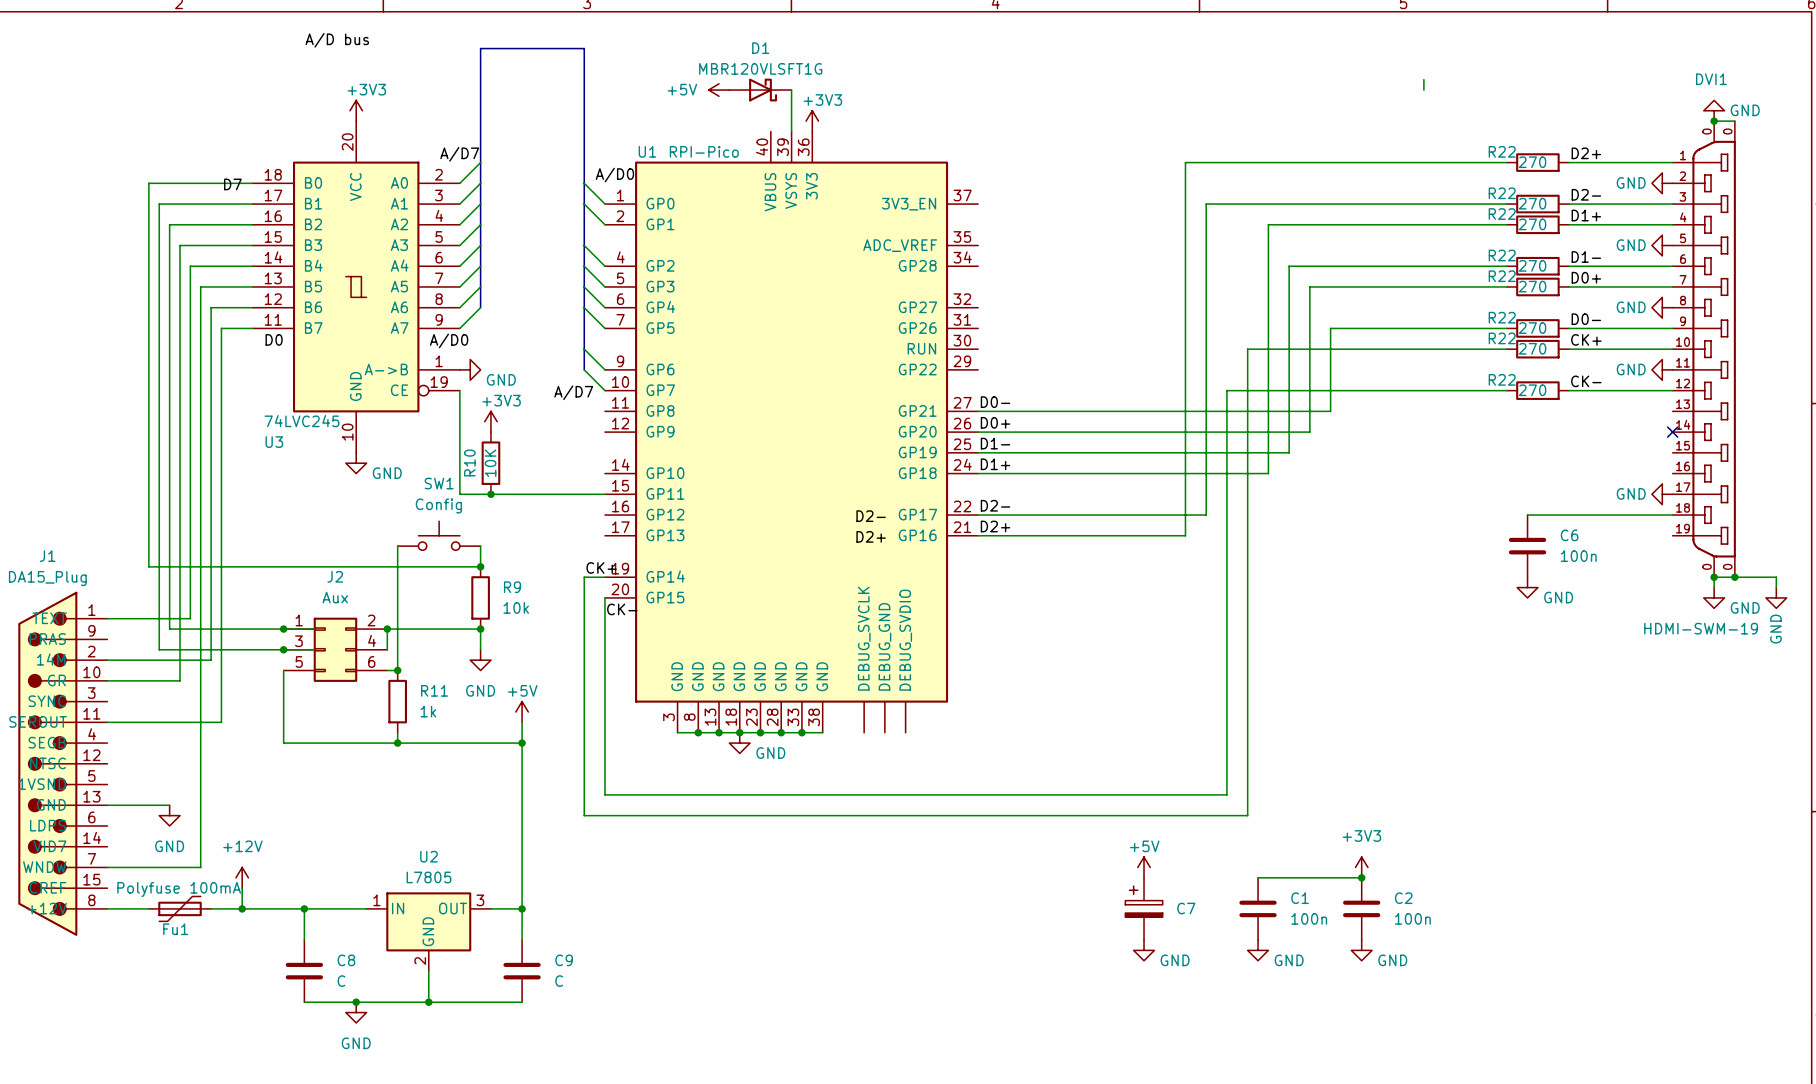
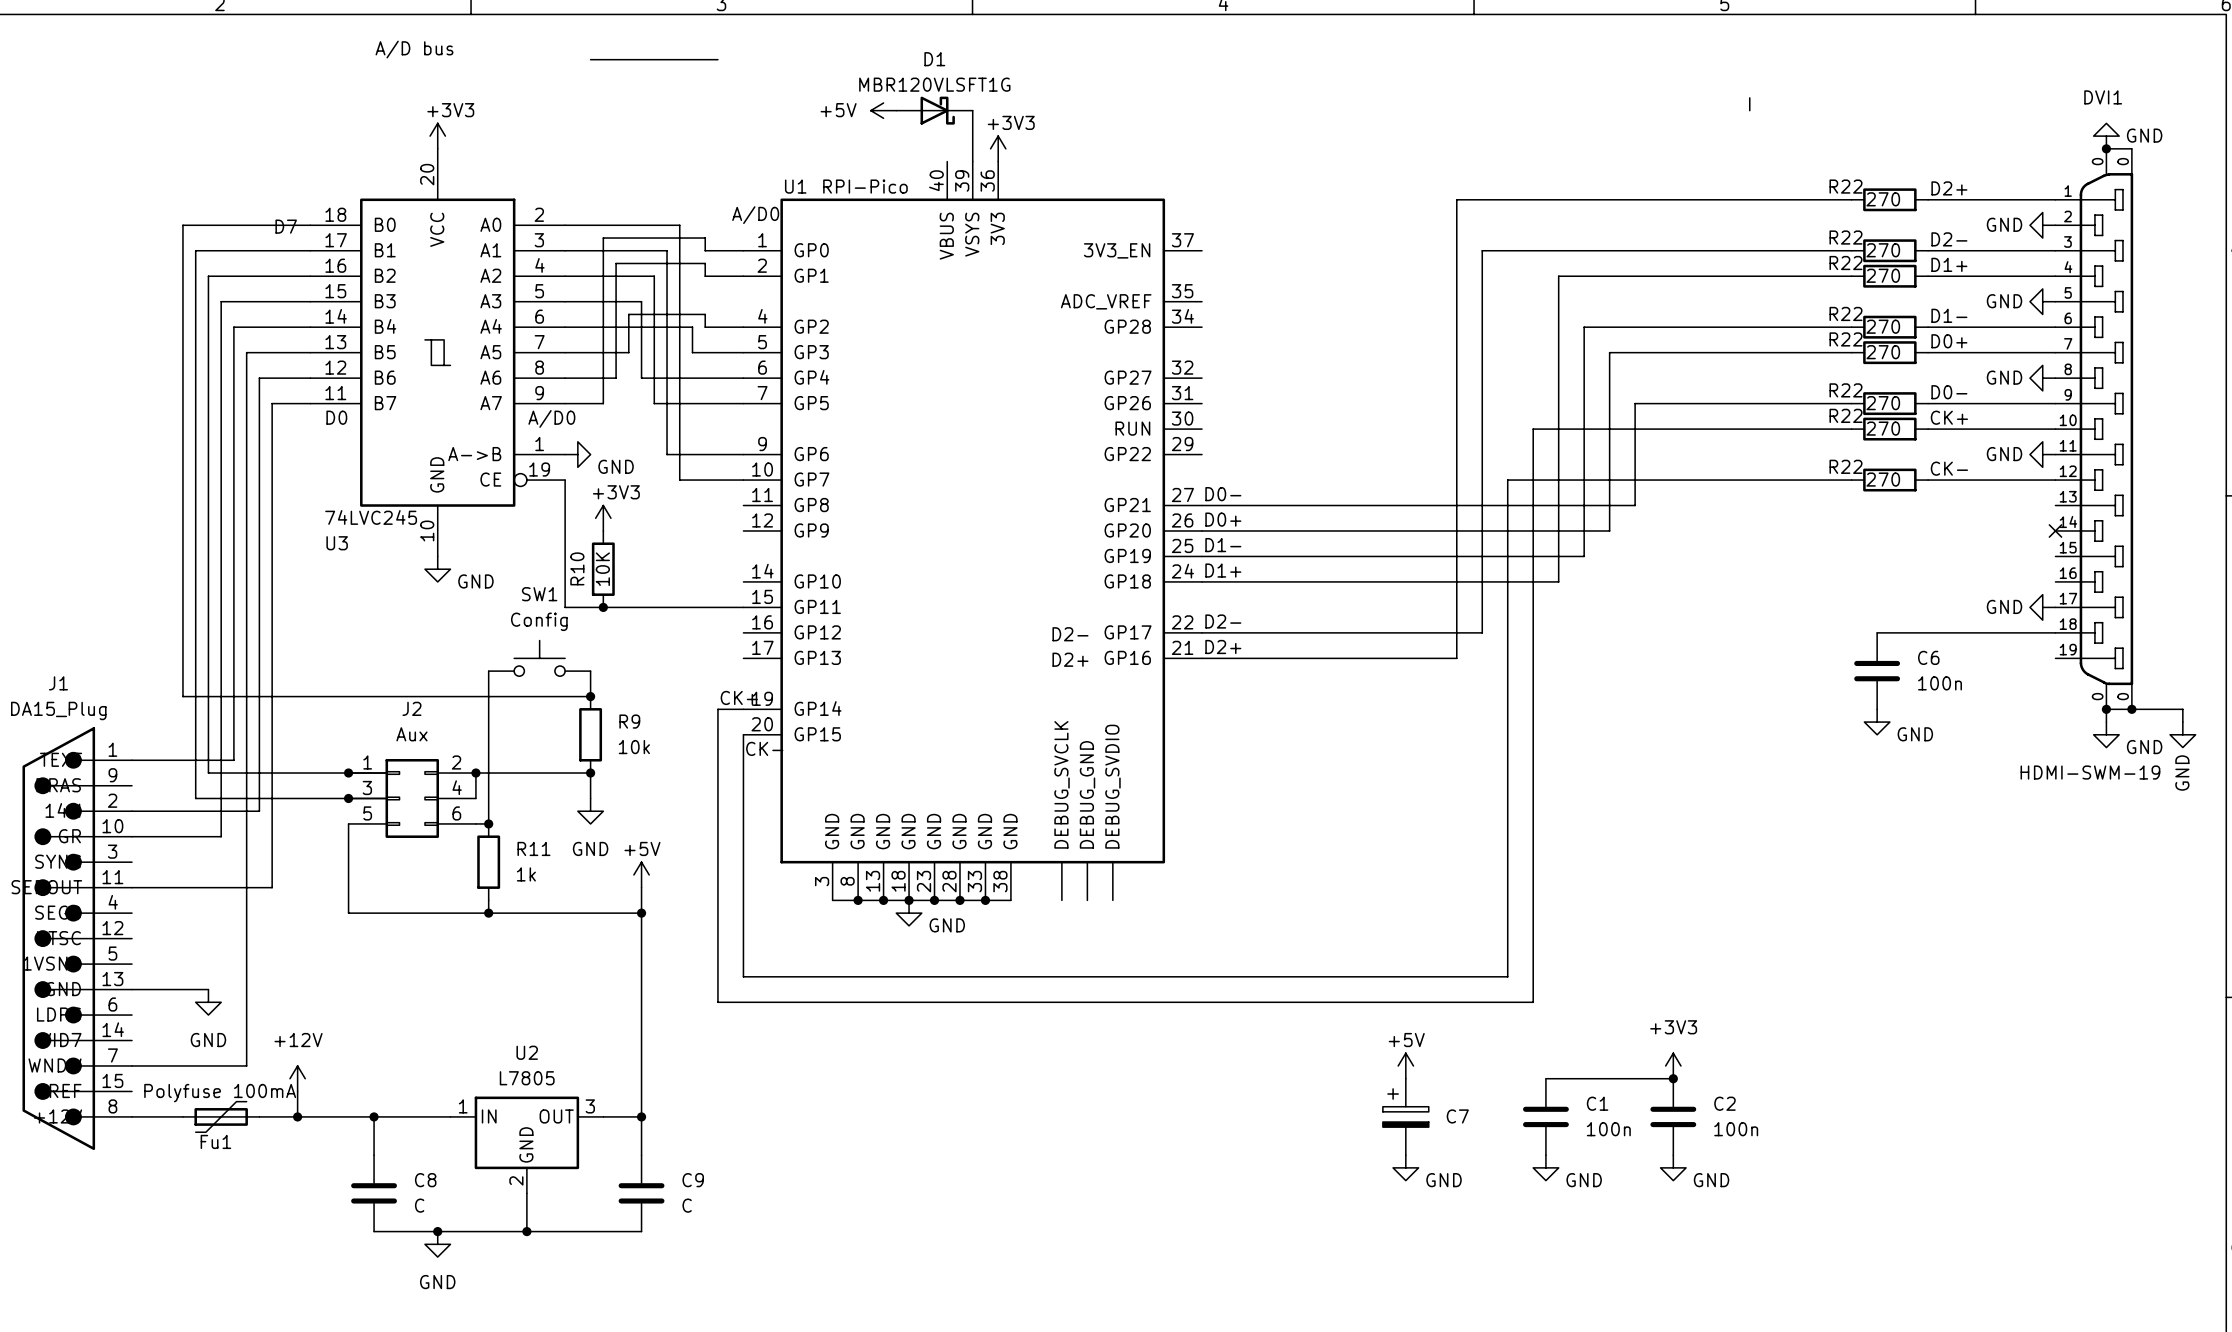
bus: (480, 48) (480, 307) -> none
bus: (584, 48) (584, 369) -> none
label: A/D7 (459, 154) -> none
wire: (480, 162) (459, 183) -> none
wire: (480, 183) (459, 204) -> none
wire: (584, 183) (604, 204) -> none
wire: (480, 204) (459, 224) -> none
wire: (584, 204) (604, 224) -> none
wire: (480, 224) (459, 245) -> none
wire: (480, 245) (459, 266) -> none
wire: (584, 245) (604, 266) -> none
wire: (480, 266) (459, 286) -> (743, 327) (705, 327) (705, 314) (628, 314) (628, 352) (565, 352)
wire: (584, 266) (604, 286) -> (565, 327) (692, 327) (692, 352) (743, 352)
wire: (480, 286) (459, 307) -> (743, 276) (705, 276) (705, 263) (616, 263) (616, 378) (565, 378)
wire: (584, 286) (604, 307) -> (565, 301) (641, 301) (641, 378) (743, 378)
wire: (480, 307) (459, 328) -> (743, 250) (705, 250) (705, 238) (603, 238) (603, 403) (565, 403)
wire: (584, 307) (604, 328) -> (565, 276) (654, 276) (654, 403) (743, 403)
wire: (584, 349) (604, 369) -> (565, 250) (667, 250) (667, 454) (743, 454)
wire: (584, 369) (604, 390) -> (565, 225) (679, 225) (679, 480) (743, 480)
label: A/D7 (573, 392) -> none

